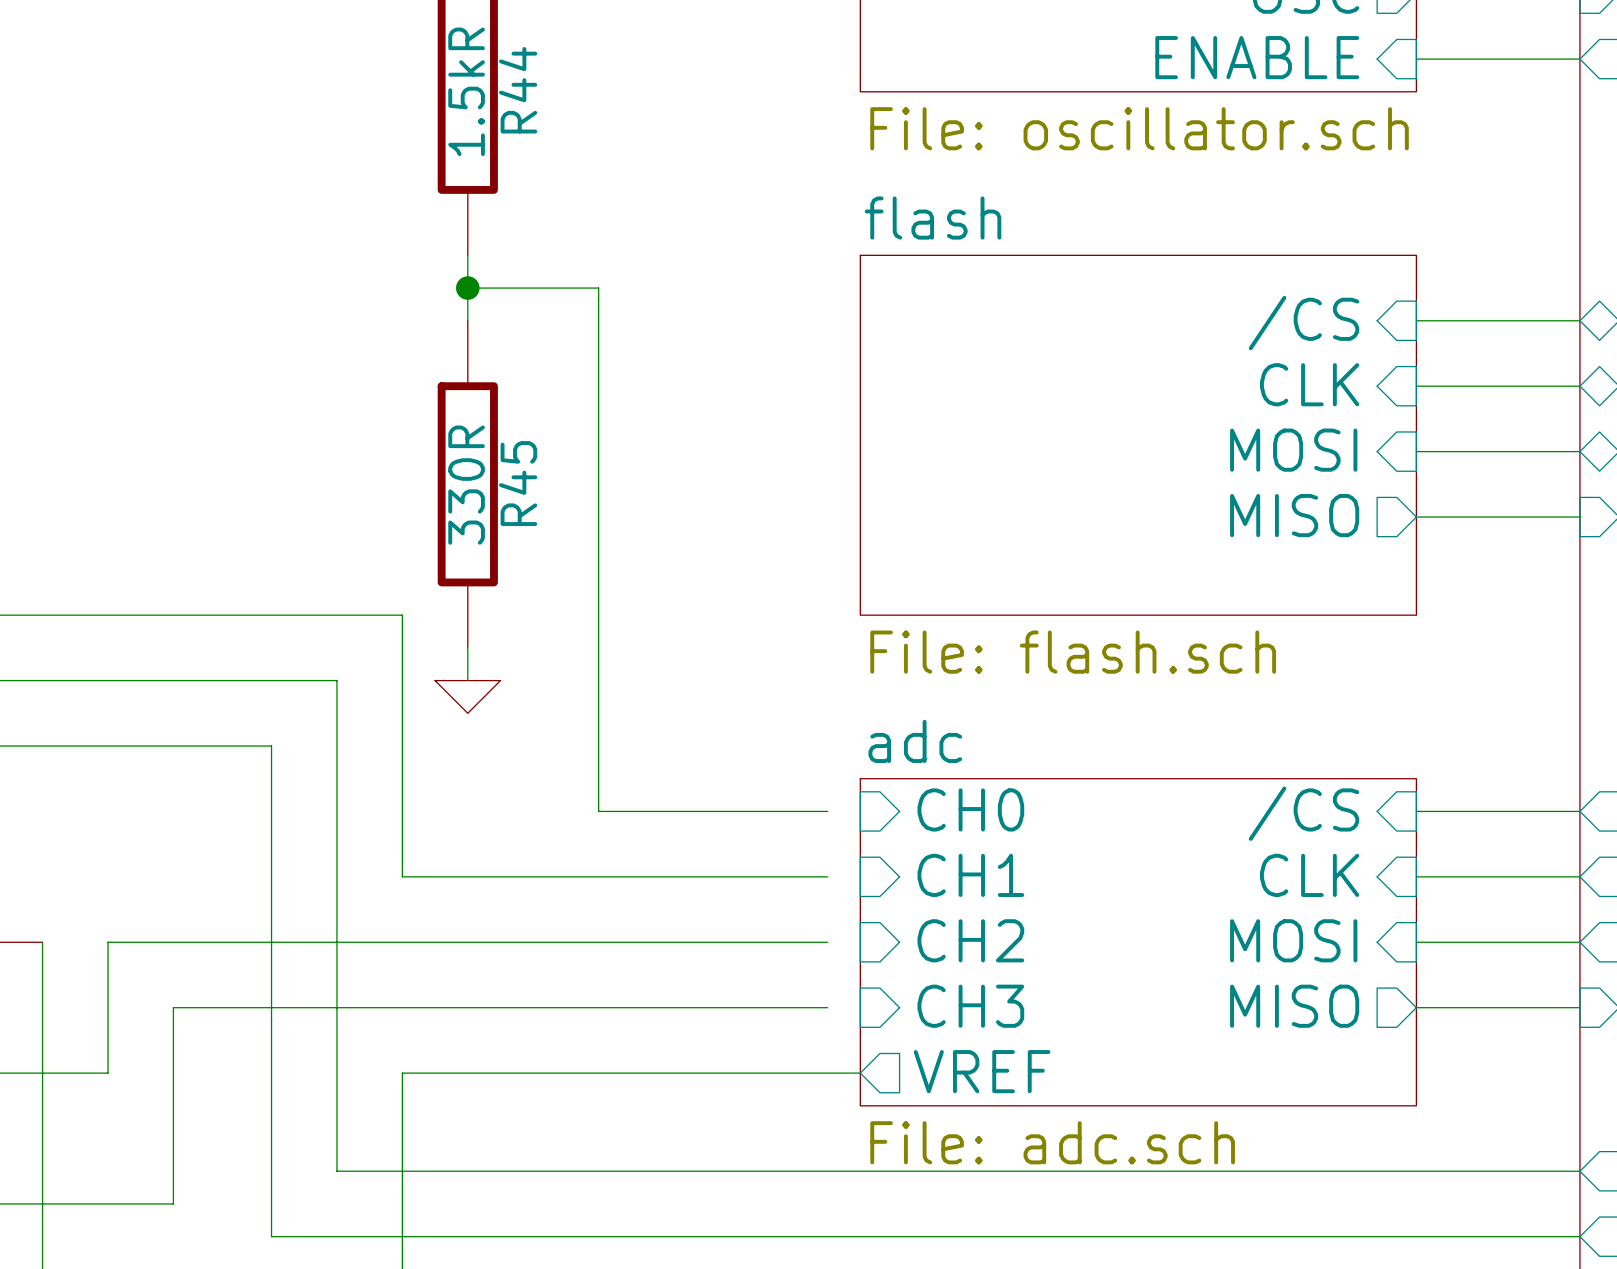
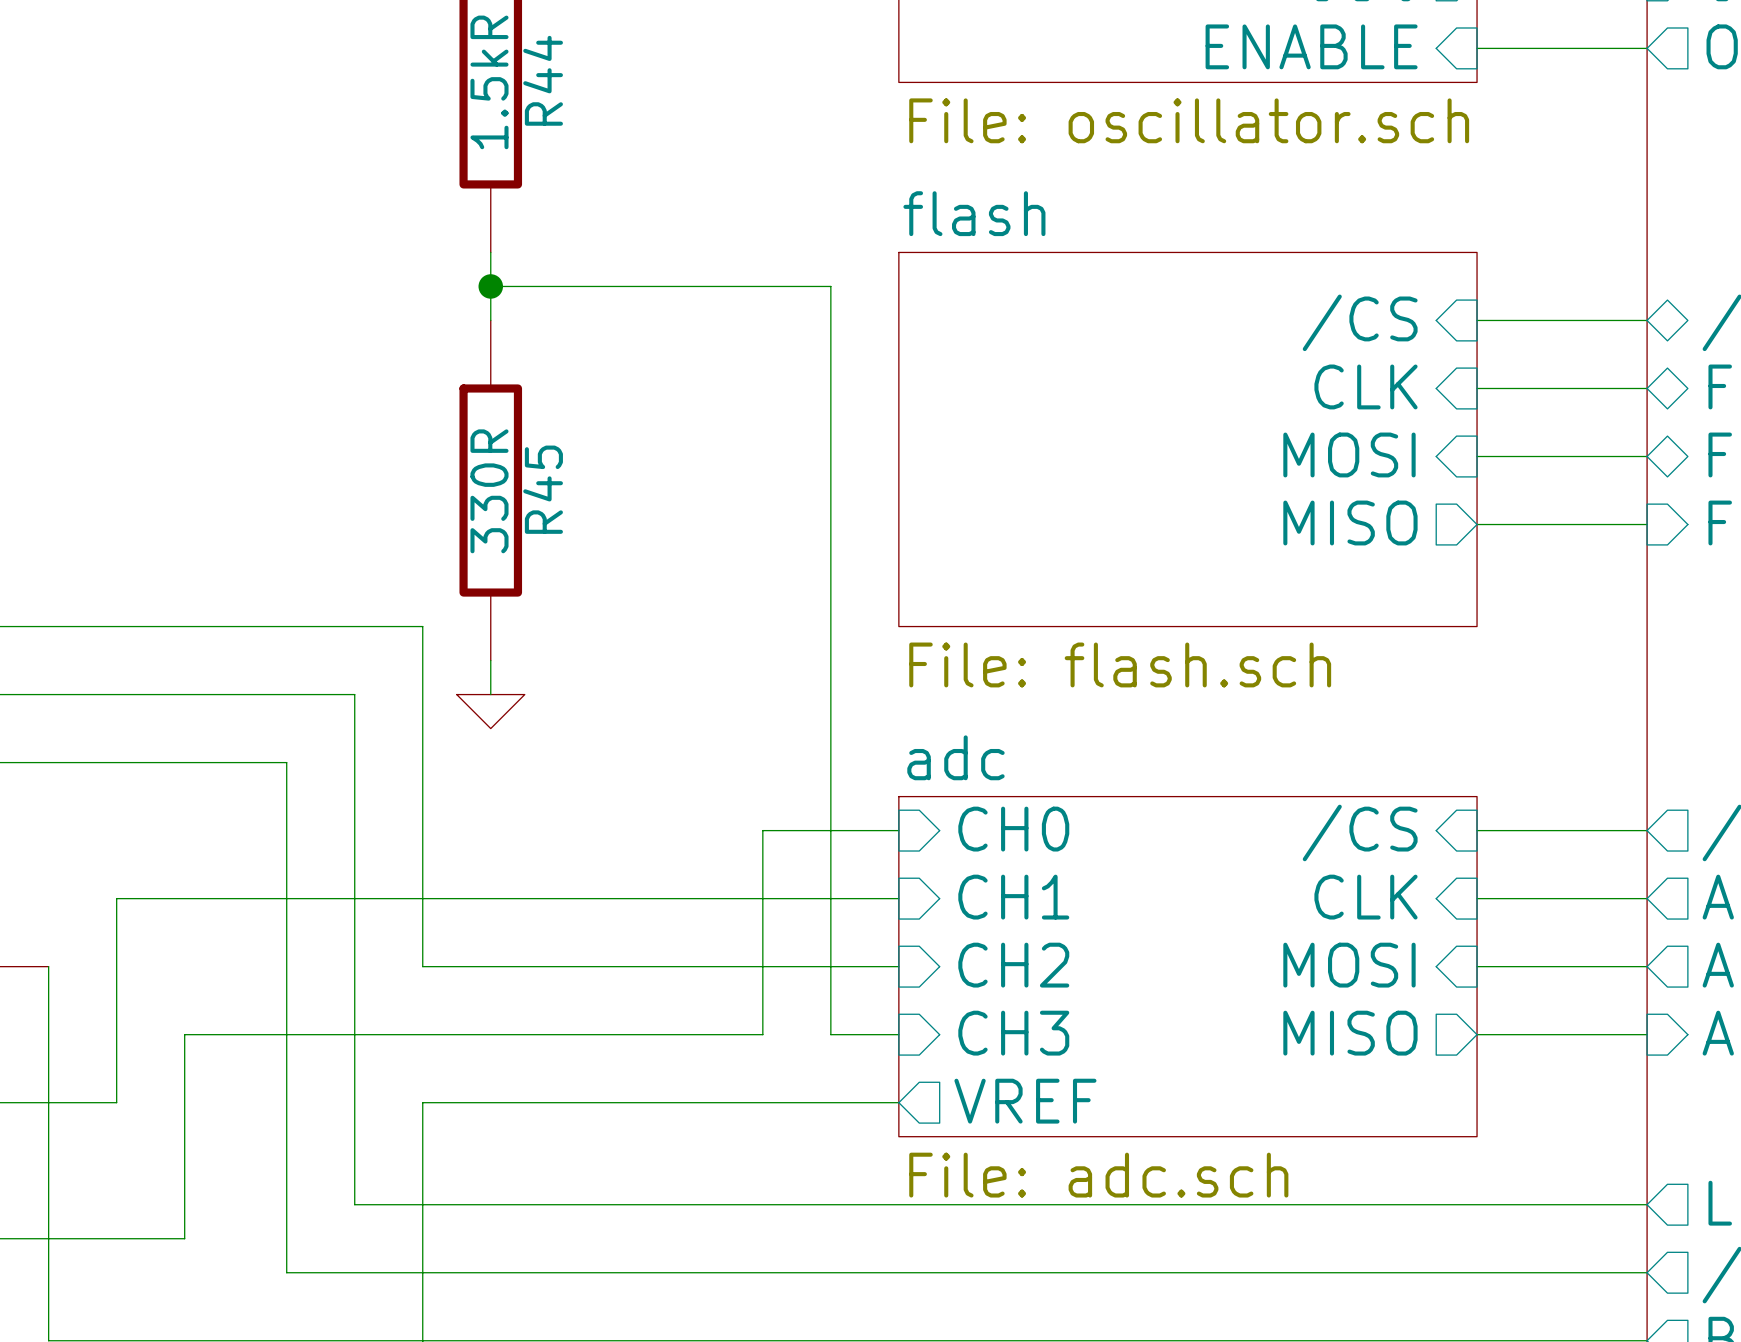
wire: (598, 288) (598, 811) (729, 811) -> (626, 286) (830, 286) (830, 1034)
wire: none -> (864, 830) (898, 830)
wire: none -> (864, 898) (898, 898)
wire: (107, 942) (402, 942) -> (116, 966) (116, 898) (422, 898) (422, 966)
wire: none -> (864, 966) (898, 966)
wire: (729, 1007) (794, 1007) -> (762, 1034) (762, 830)
wire: none -> (864, 1034) (898, 1034)

